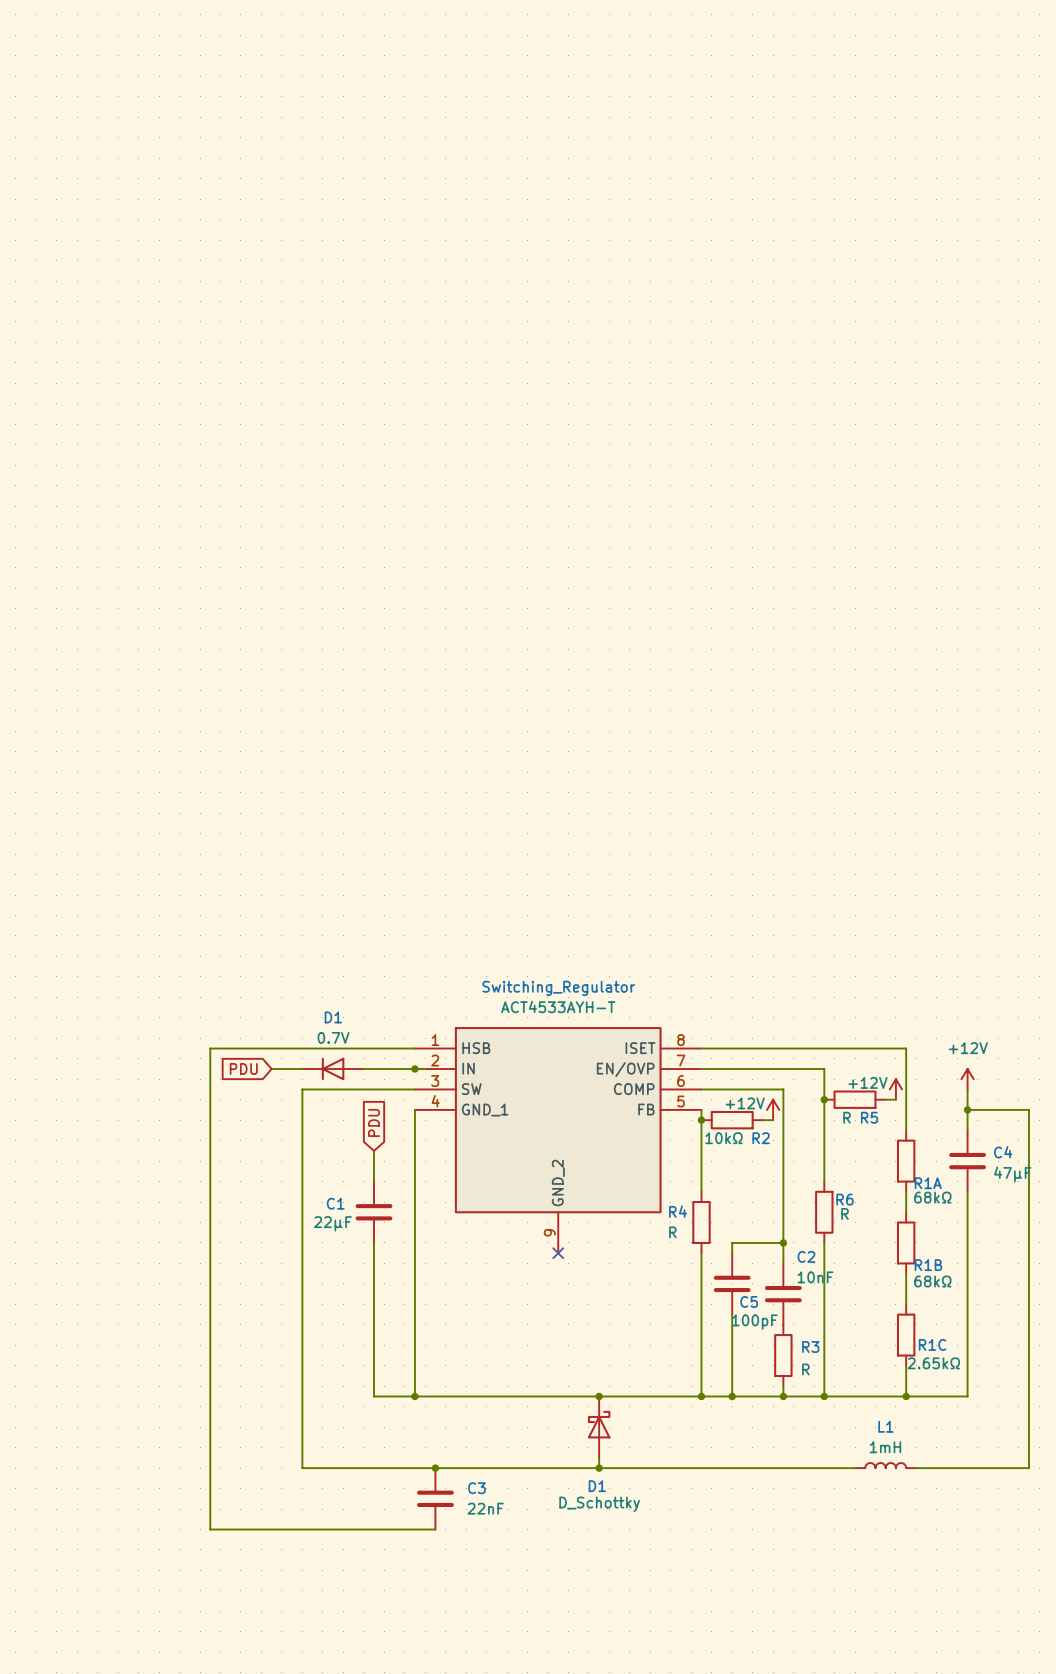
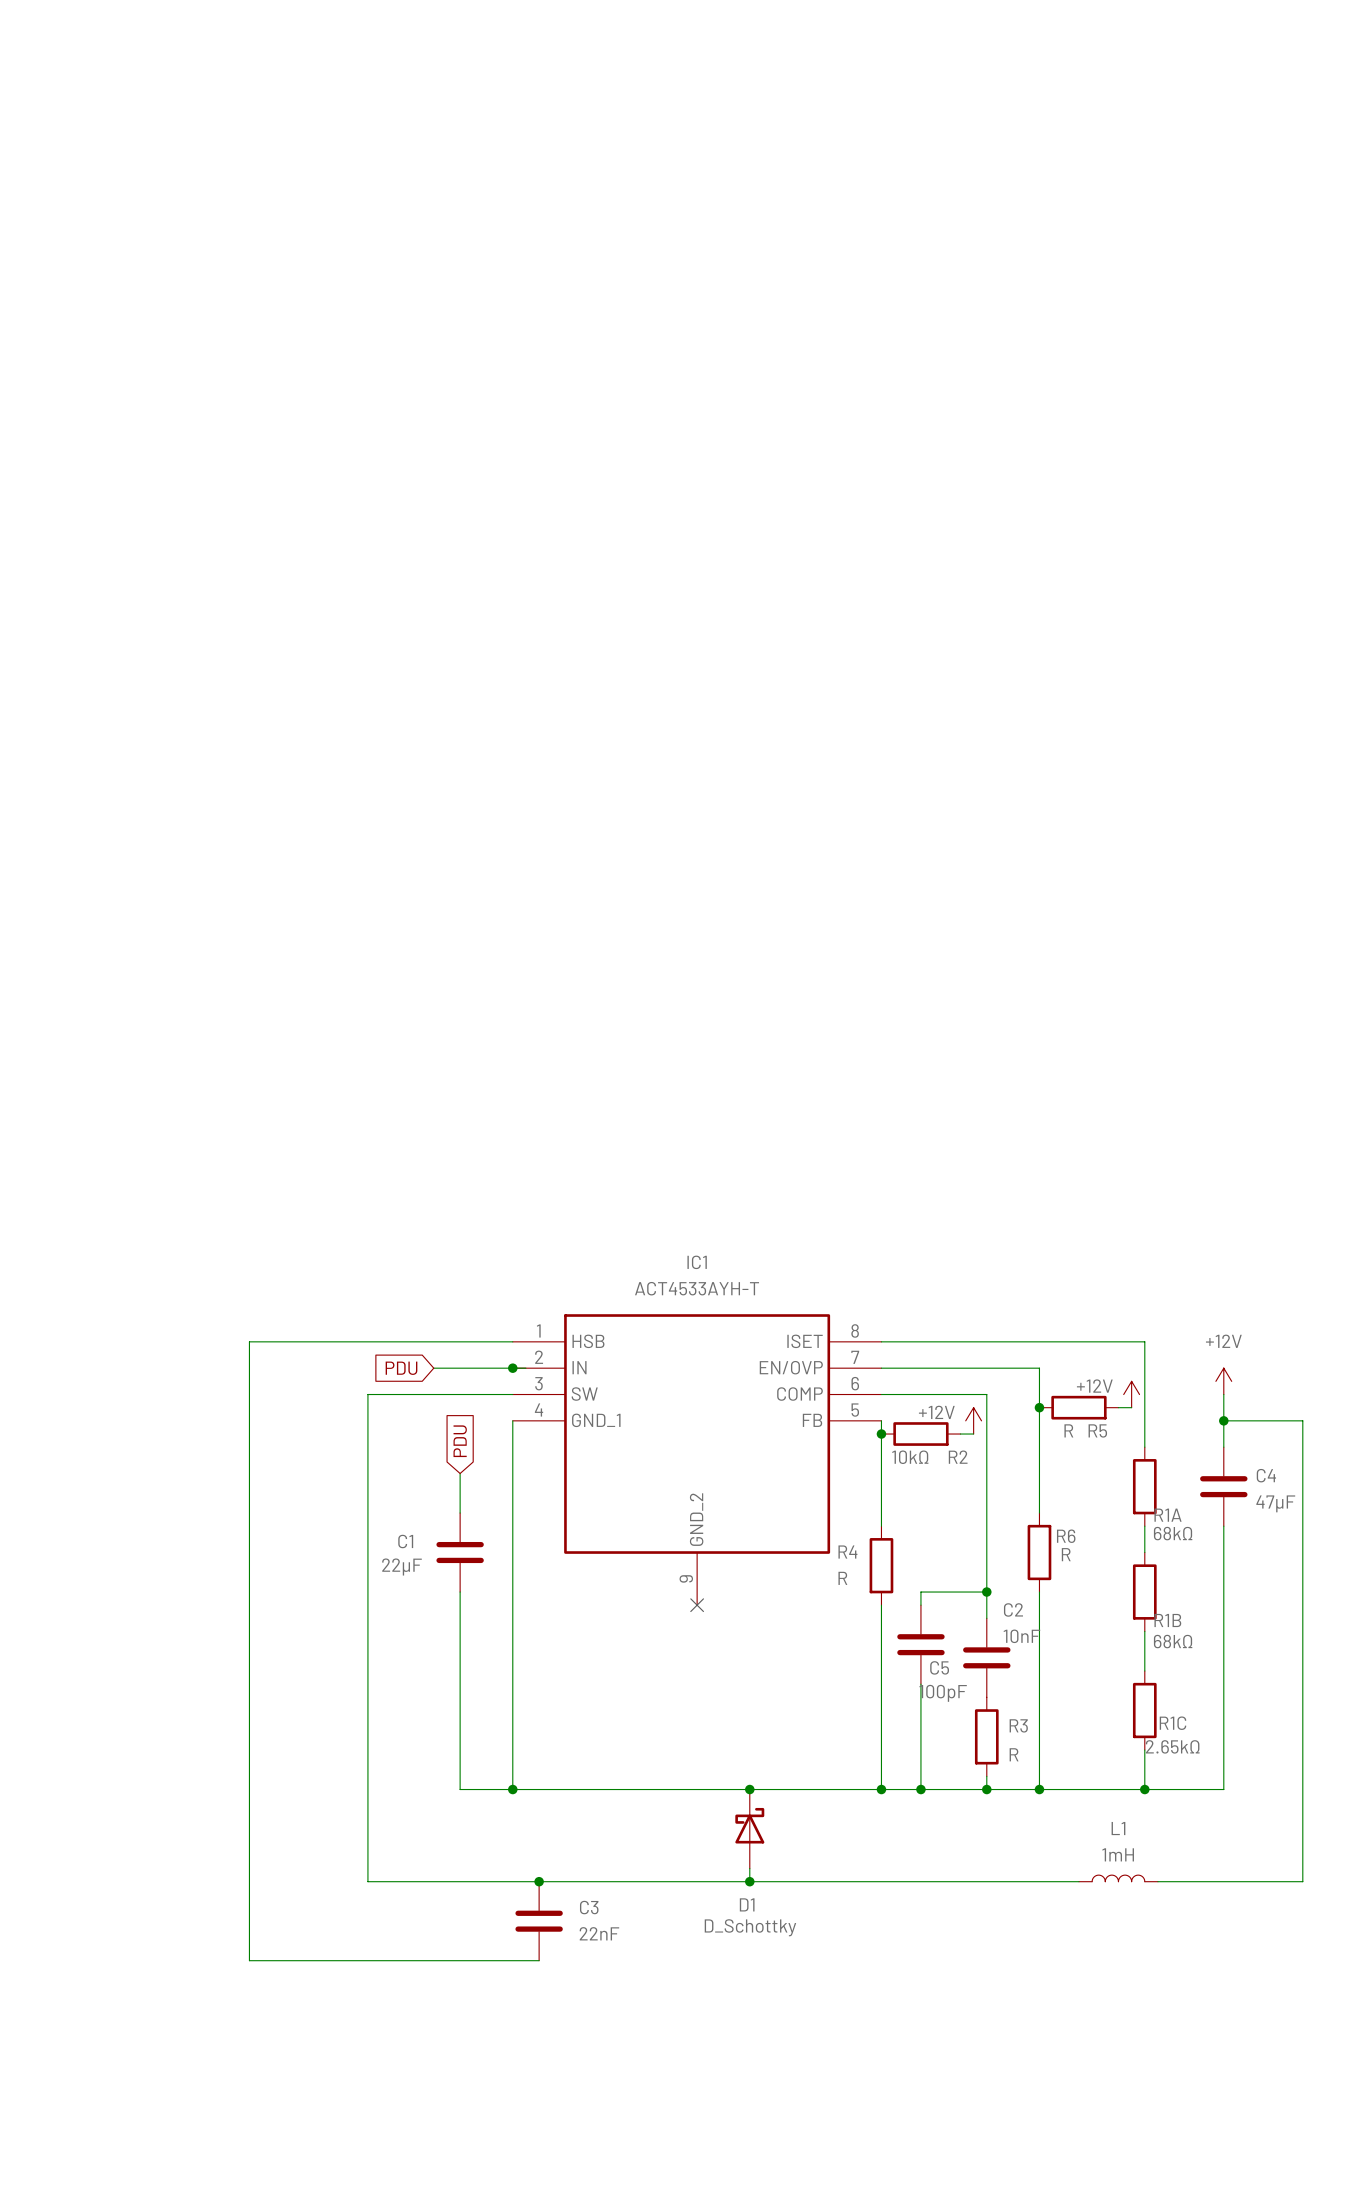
Switching_Regulator name: Switching_Regulator (558, 988) -> IC1 (697, 1262)
global label position: PDU (243, 1069) -> PDU (401, 1368)
wire: (271, 1069) (302, 1069) -> none
D1: 0.7V (333, 1069) -> none

